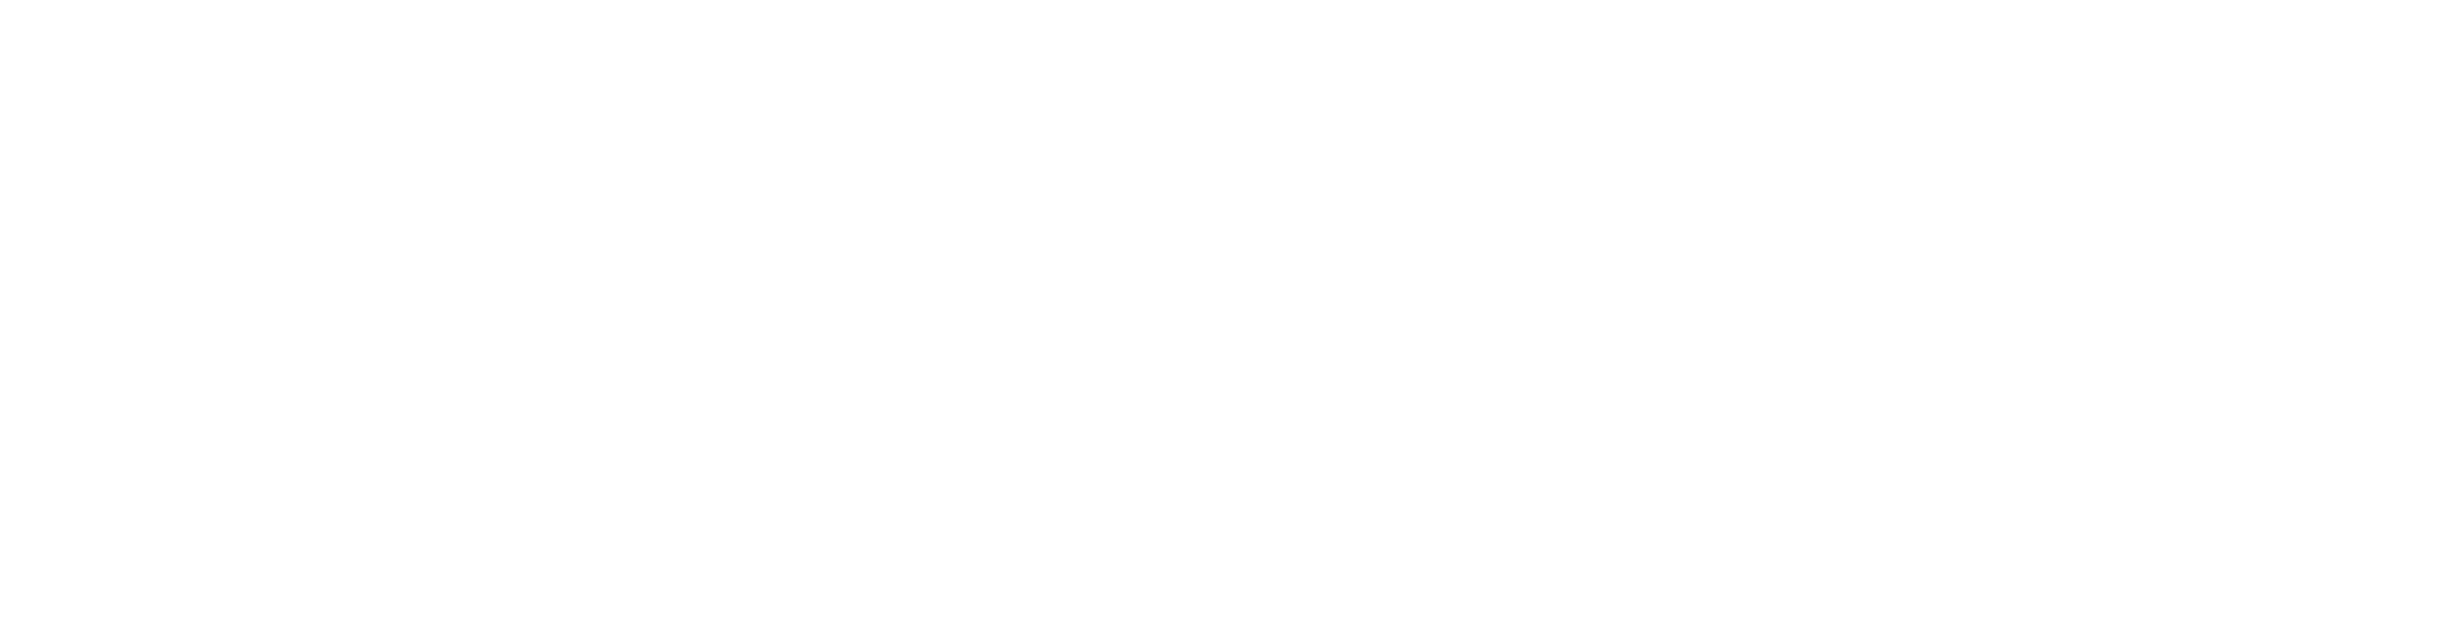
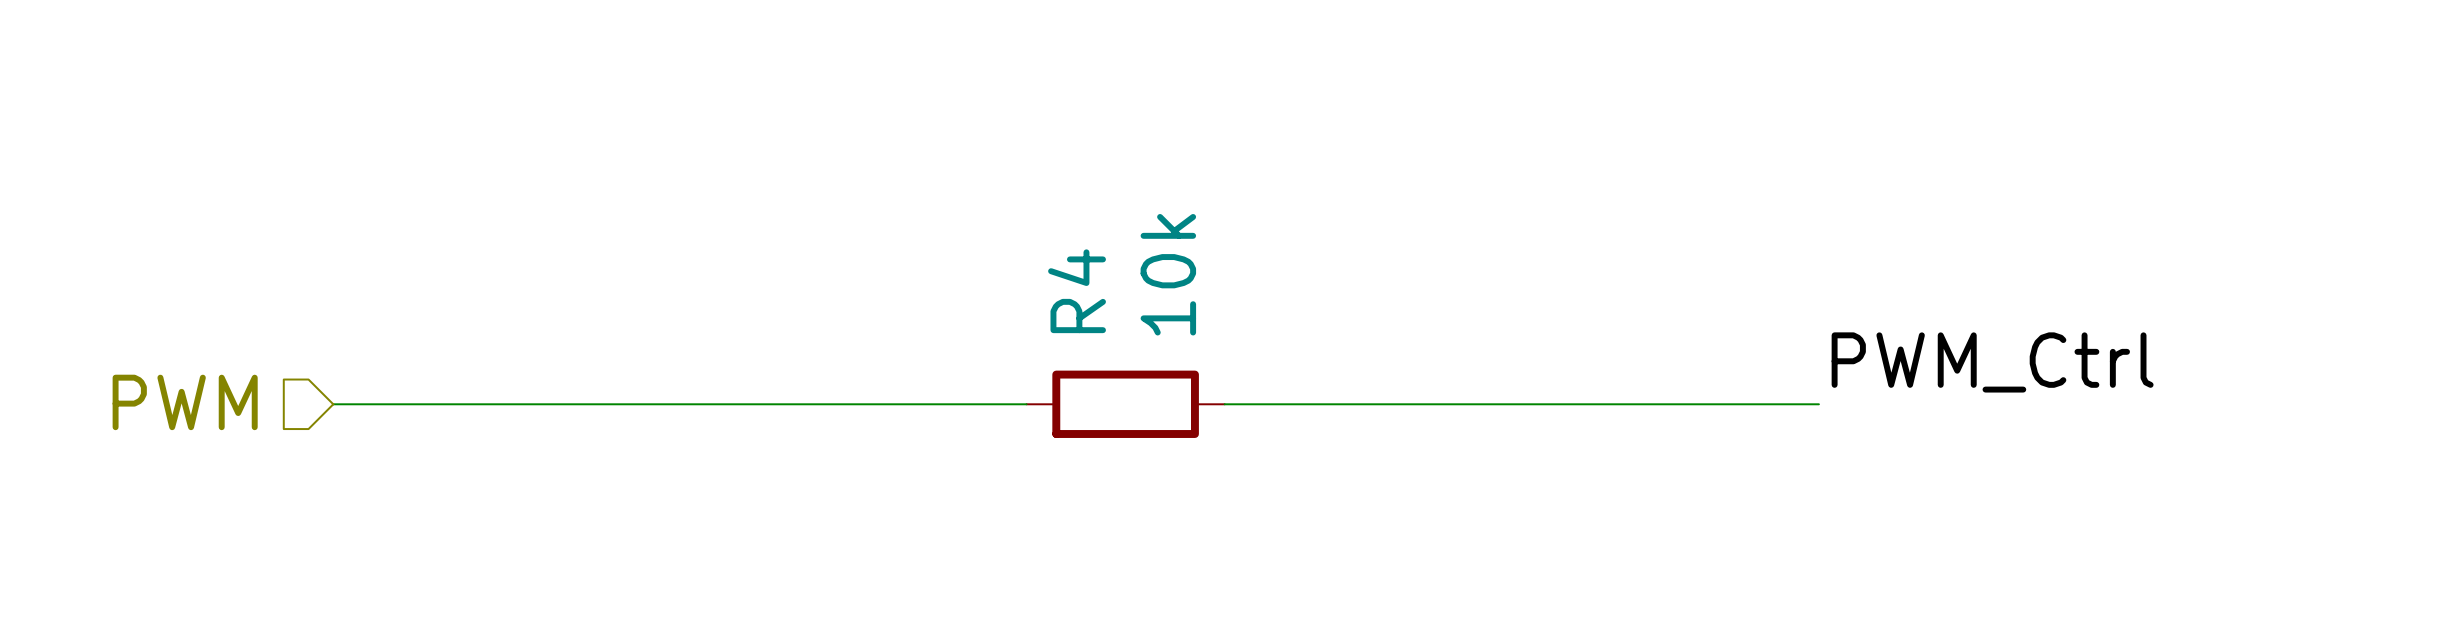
label: none -> PWM_Ctrl (1992, 362)
hierarchical label: none -> PWM (185, 402)
wire: none -> (333, 404) (1026, 404)
R4: none -> 10k (1125, 404)
wire: none -> (1224, 404) (1818, 404)

